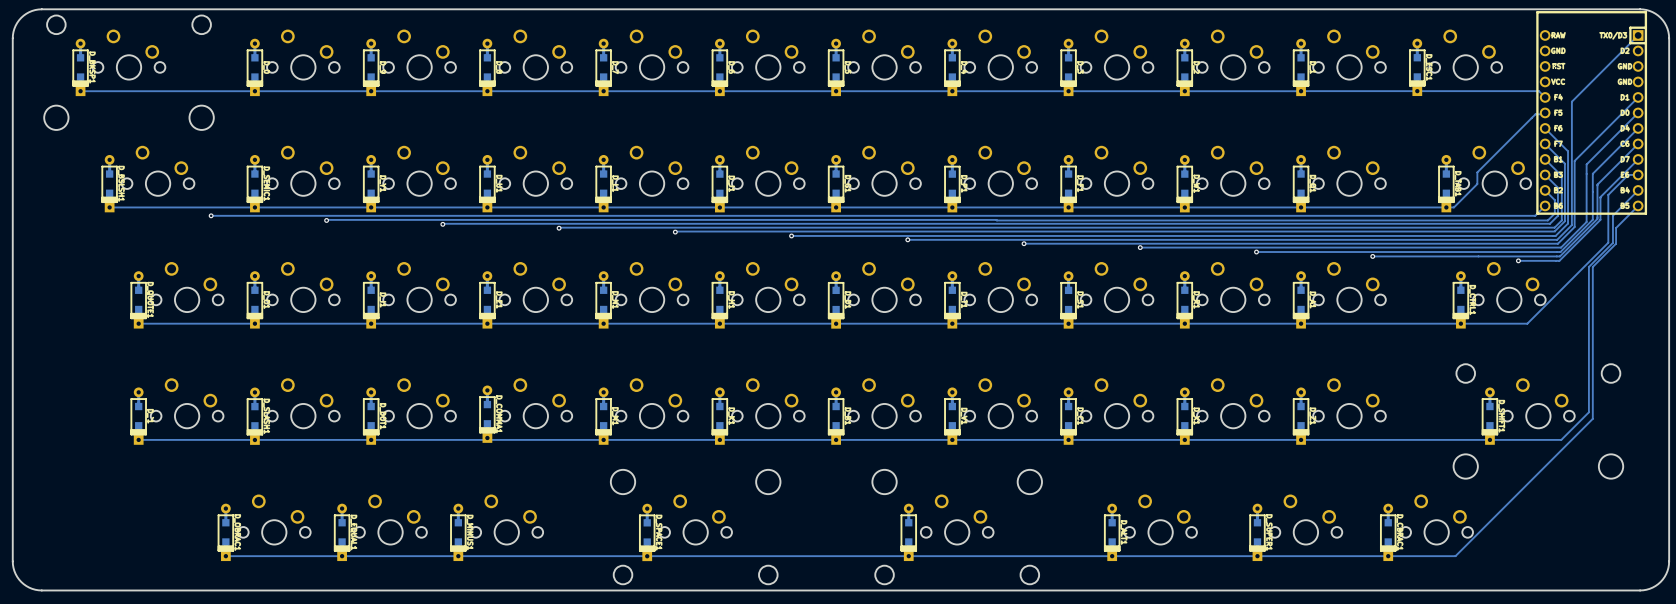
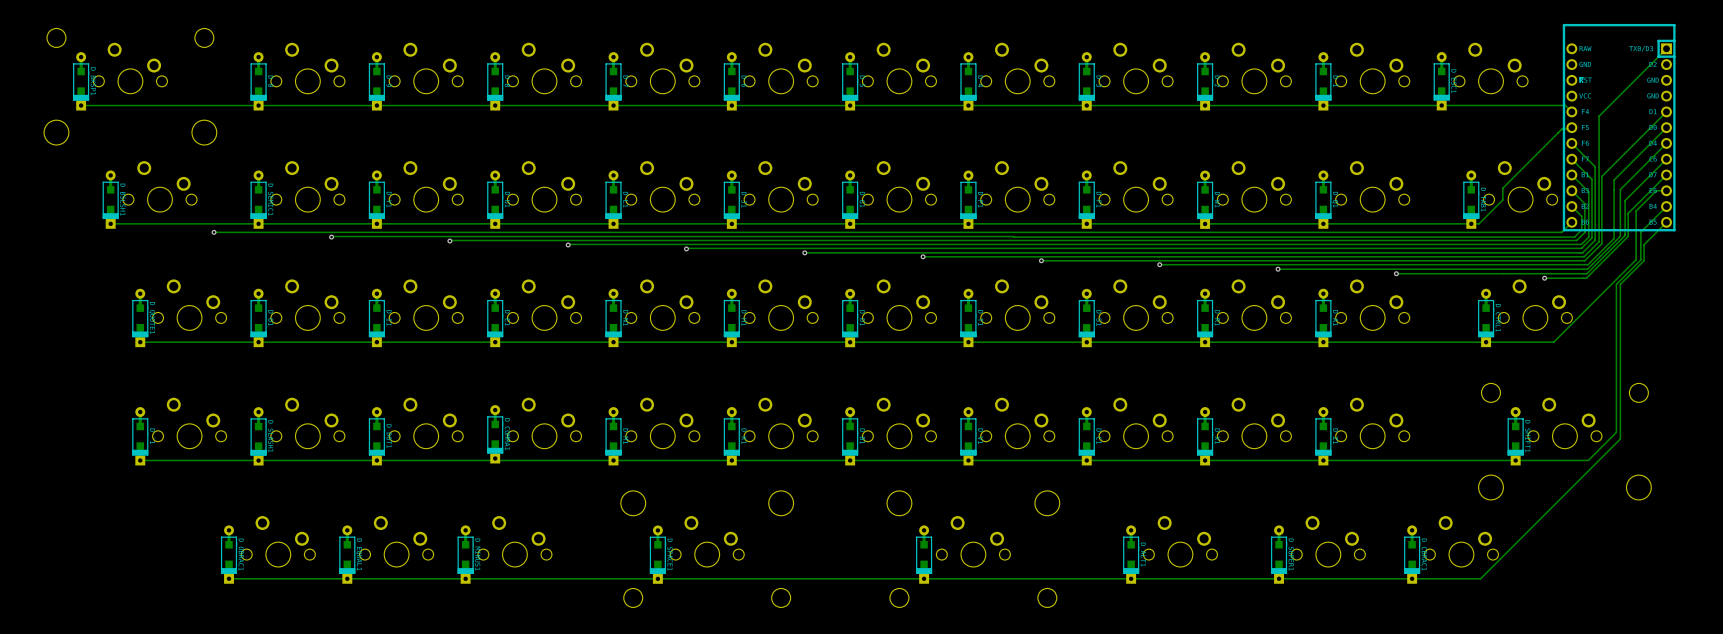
board edge: (1640, 9) (41, 9) (32, 10) (19, 20) (14, 28) (12, 38) (12, 561) (14, 571) (19, 579) (26, 586) (41, 590) (1640, 590) (1649, 588) (1658, 584) (1664, 576) (1669, 561) (1669, 38) (1666, 25) (1660, 17) (1649, 10) (1640, 9) -> none

